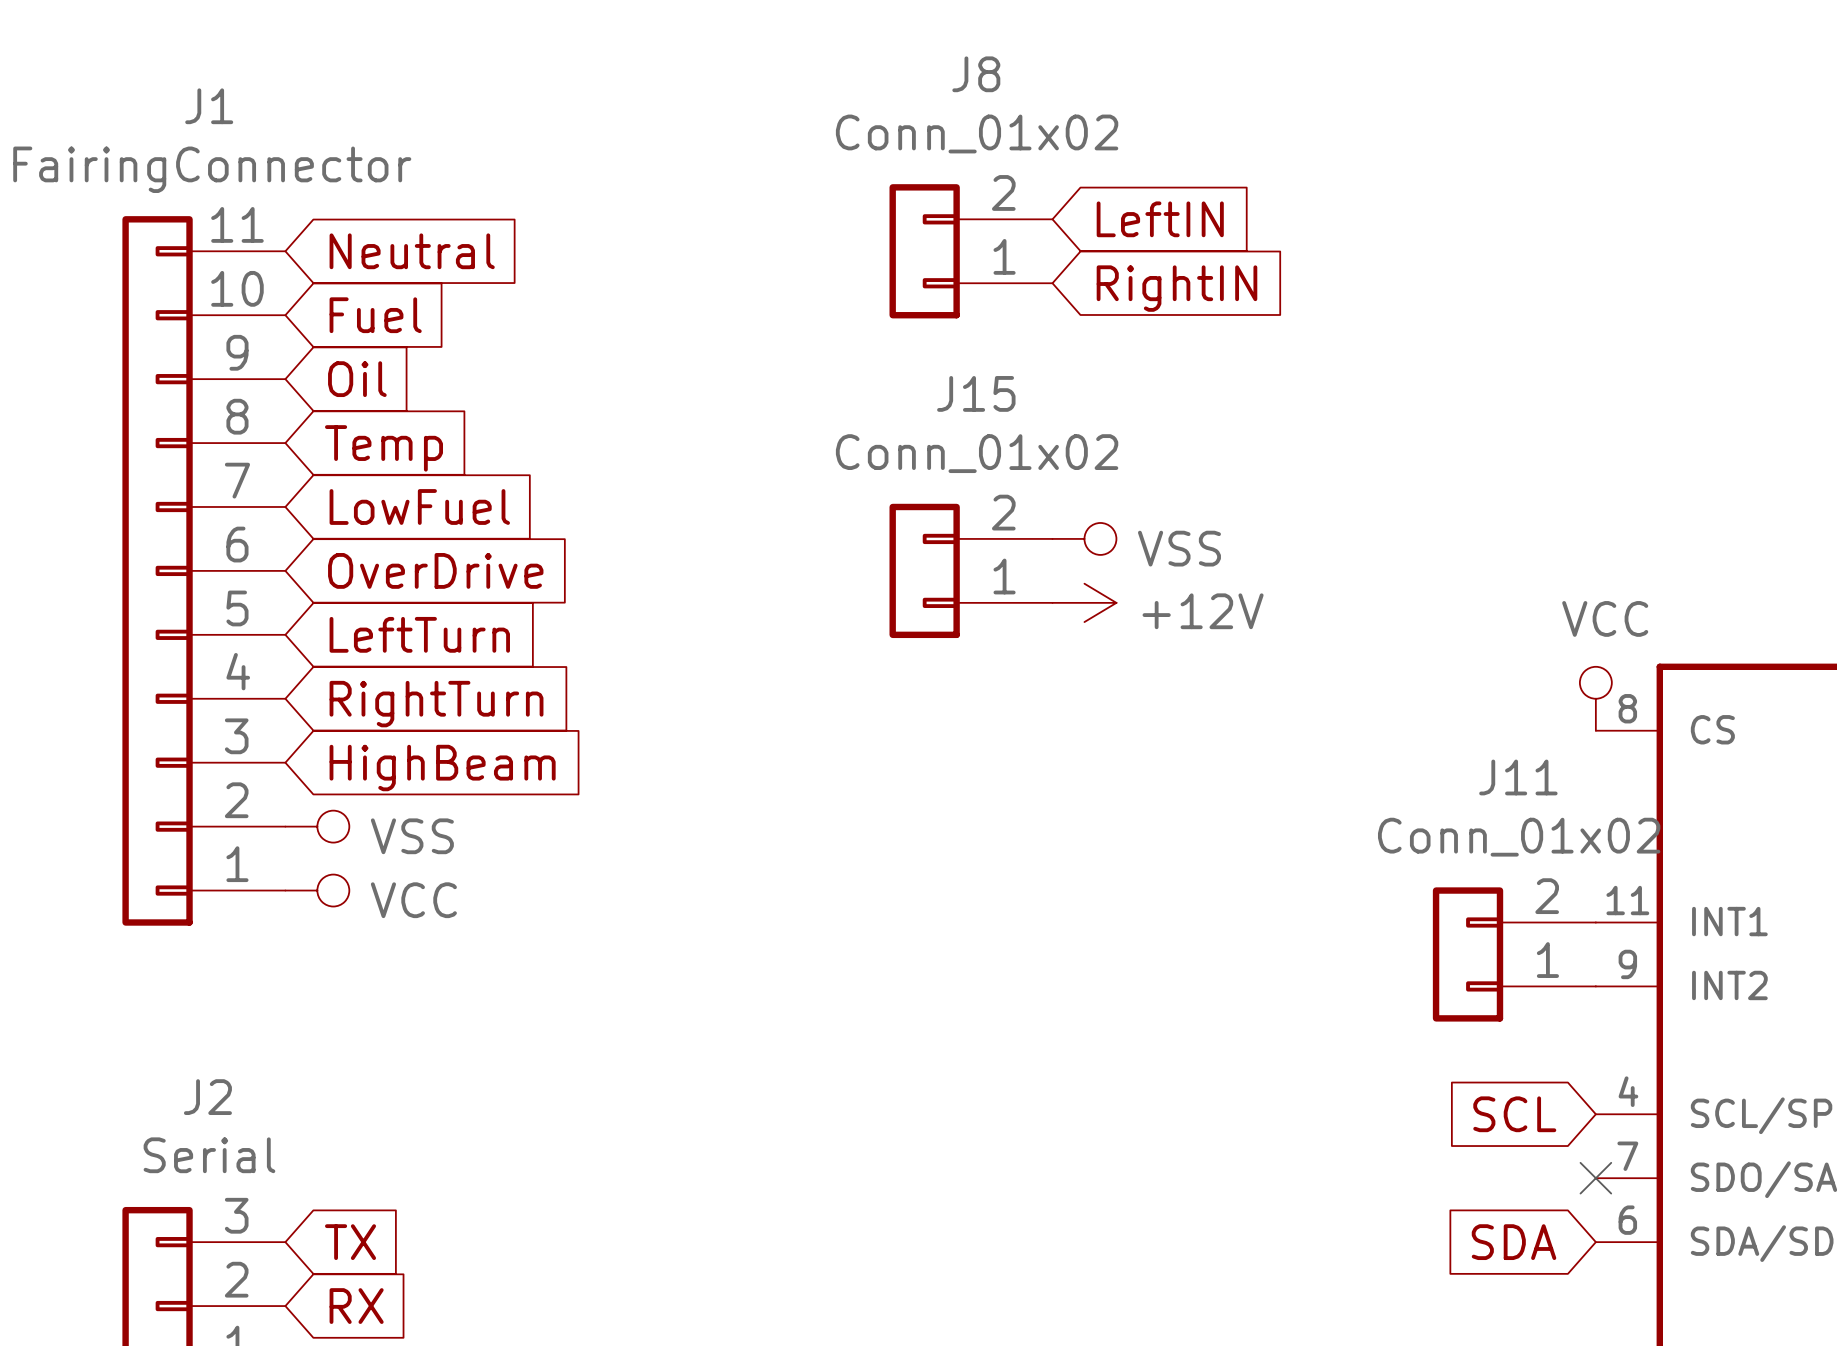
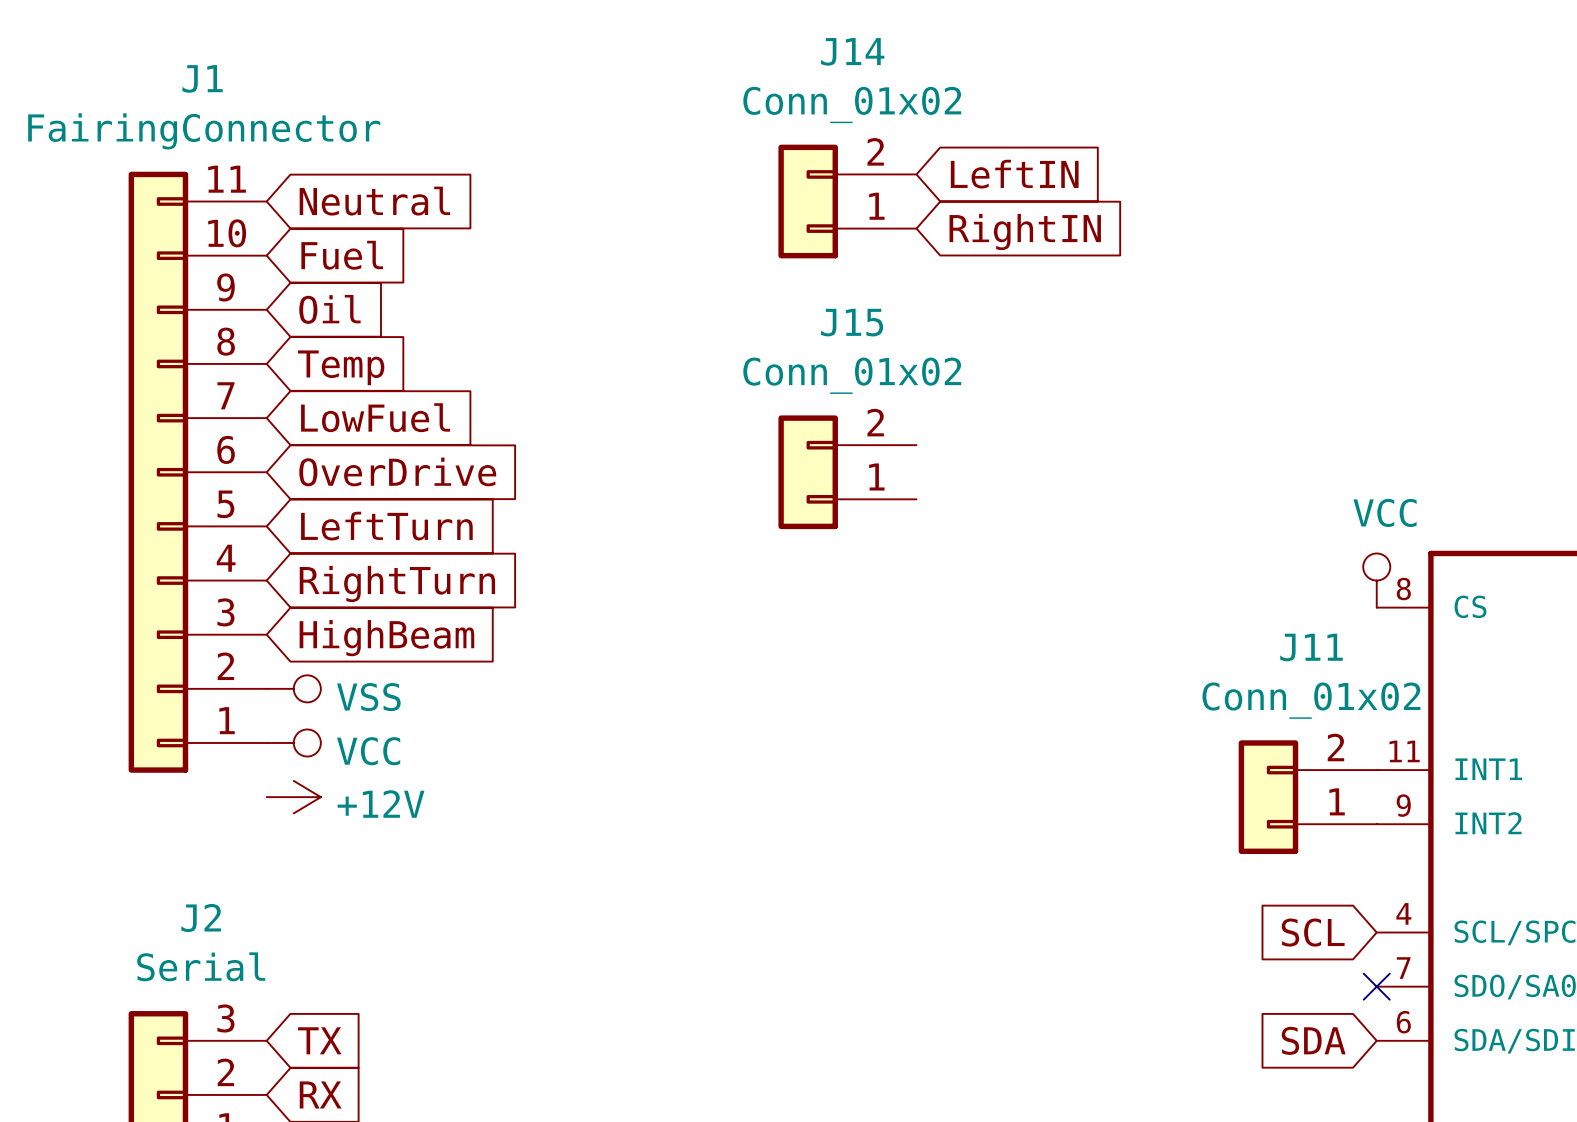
J8 name: J8 (976, 74) -> J14 (852, 51)
power symbol: VSS (1084, 538) -> none
power symbol: +12V (1084, 602) -> none
power symbol: none -> +12V (293, 797)

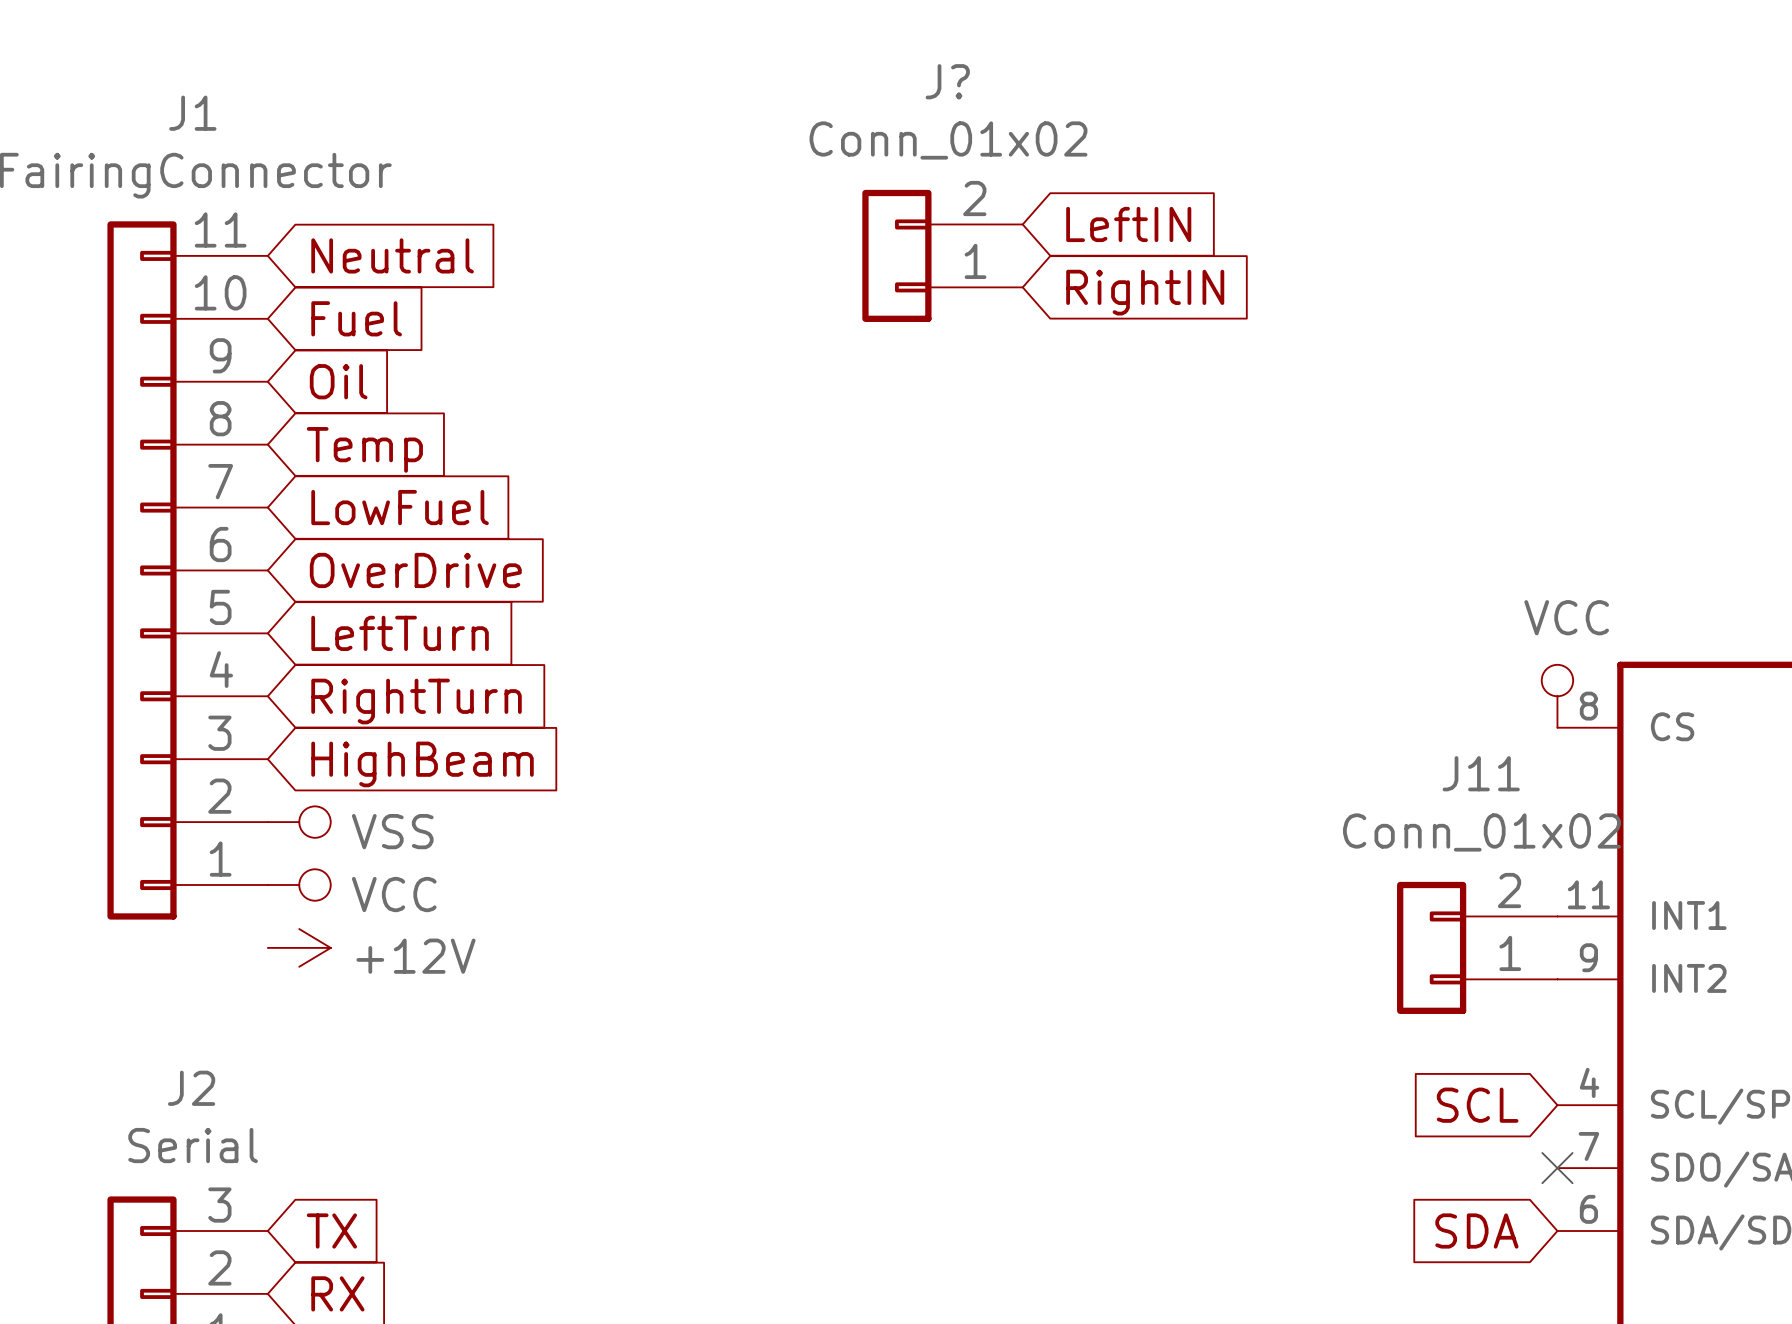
J14 name: J14 (852, 51) -> J? (947, 81)
J15: Conn_01x02 (847, 472) -> none

